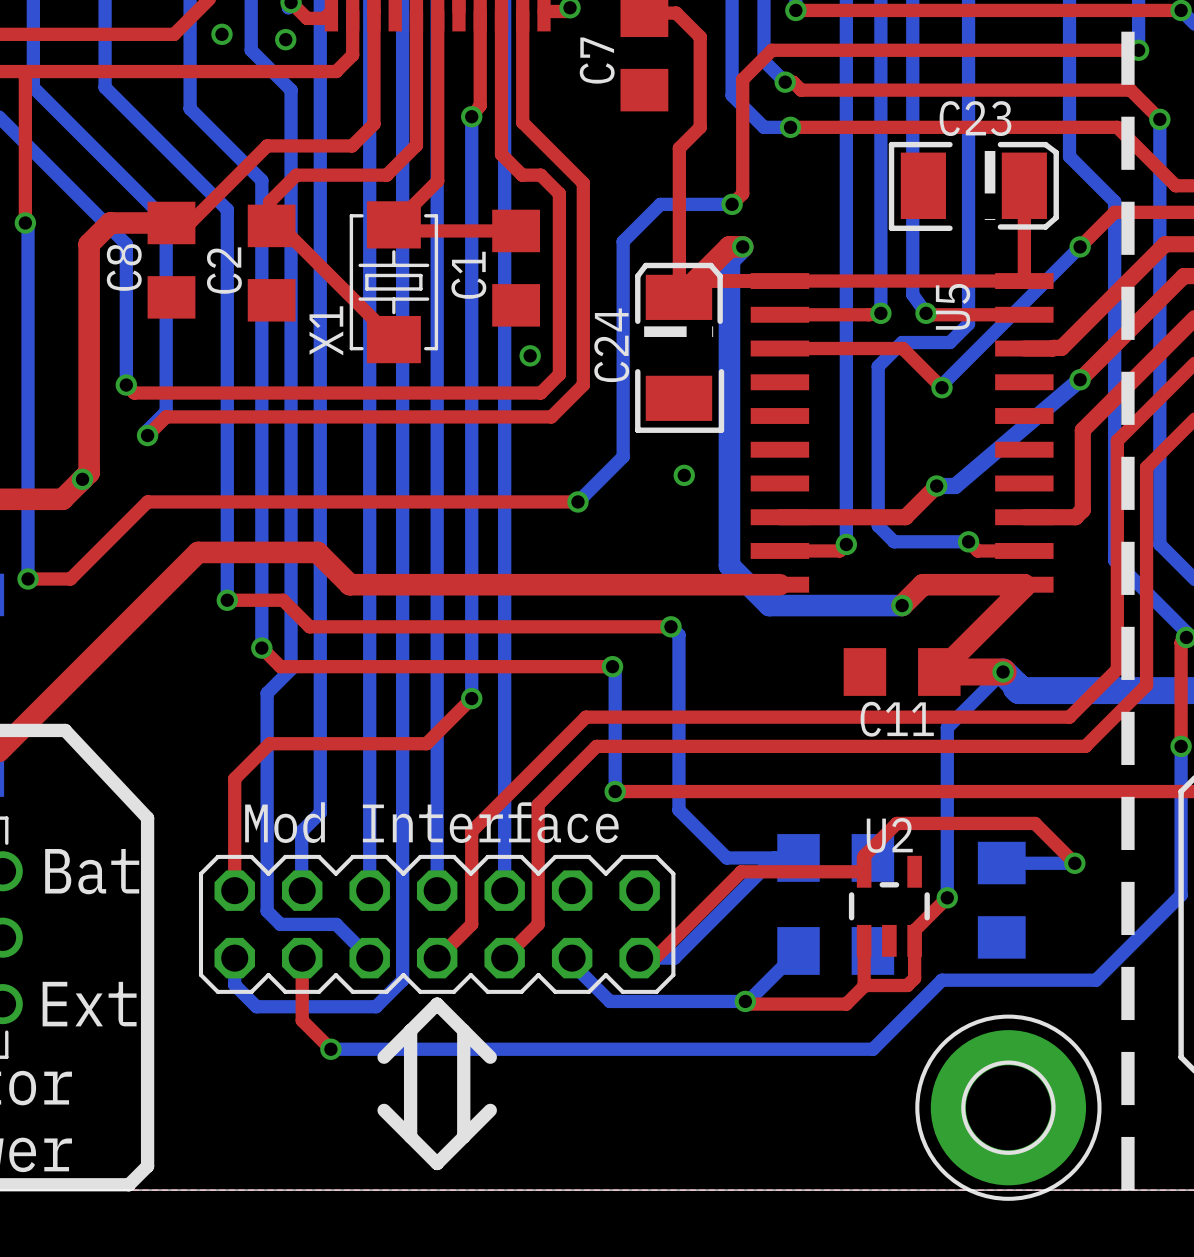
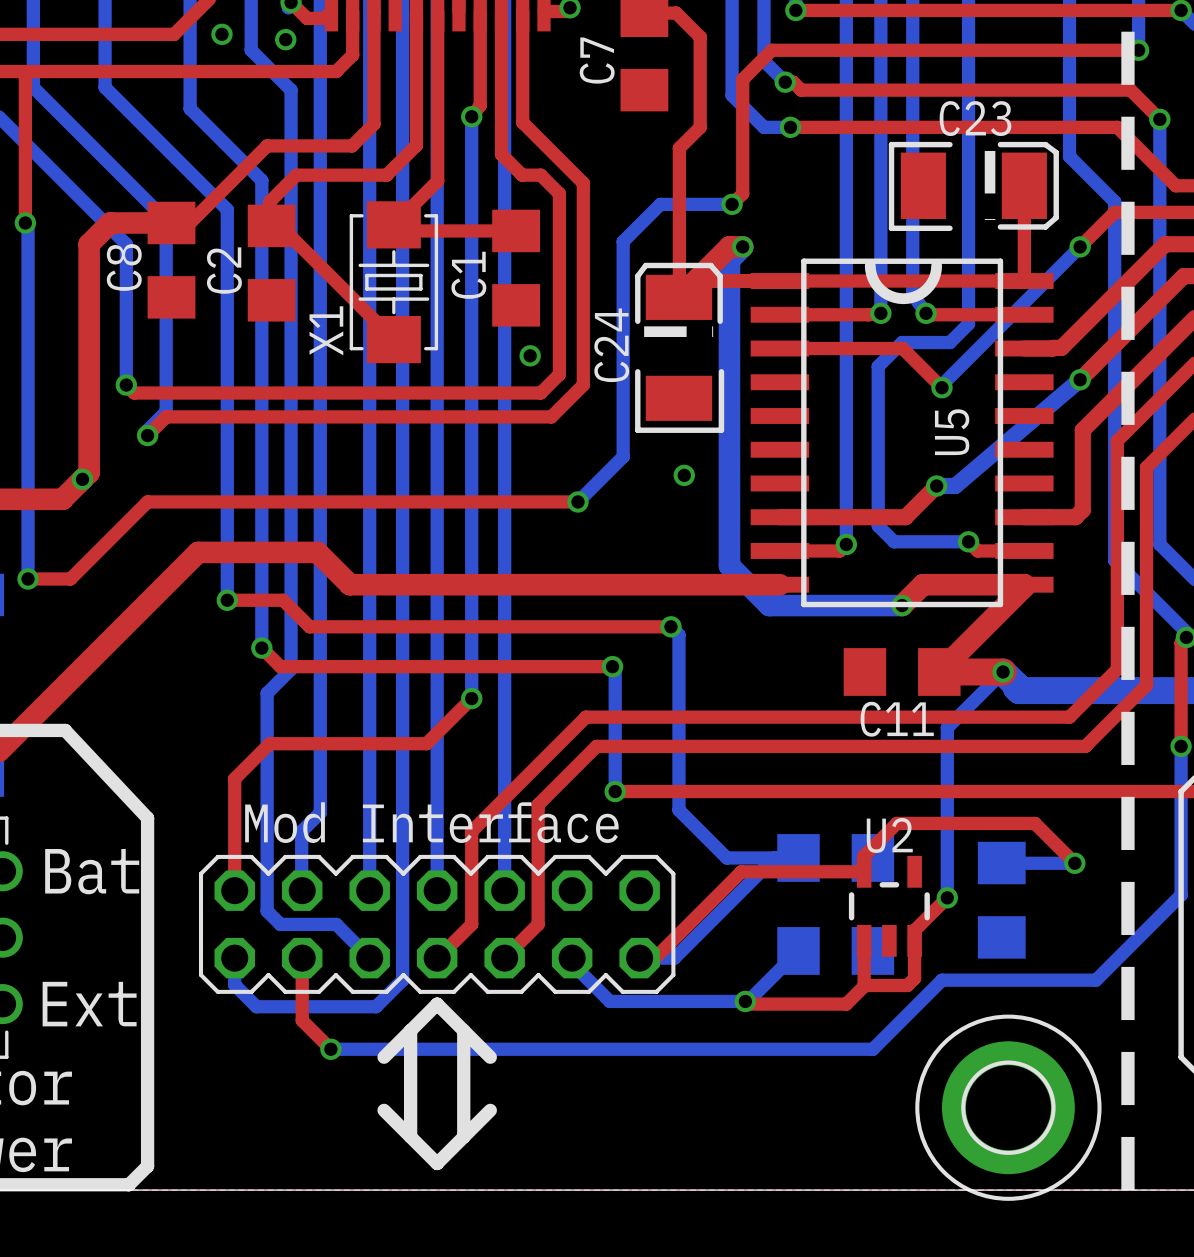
U5 footprint: [750, 273, 1054, 593] -> [750, 258, 1054, 608]
U5 name position: U5 (953, 306) -> U5 (952, 432)
part footprint: [915, 1014, 1102, 1201] -> [915, 1014, 1102, 1201]

